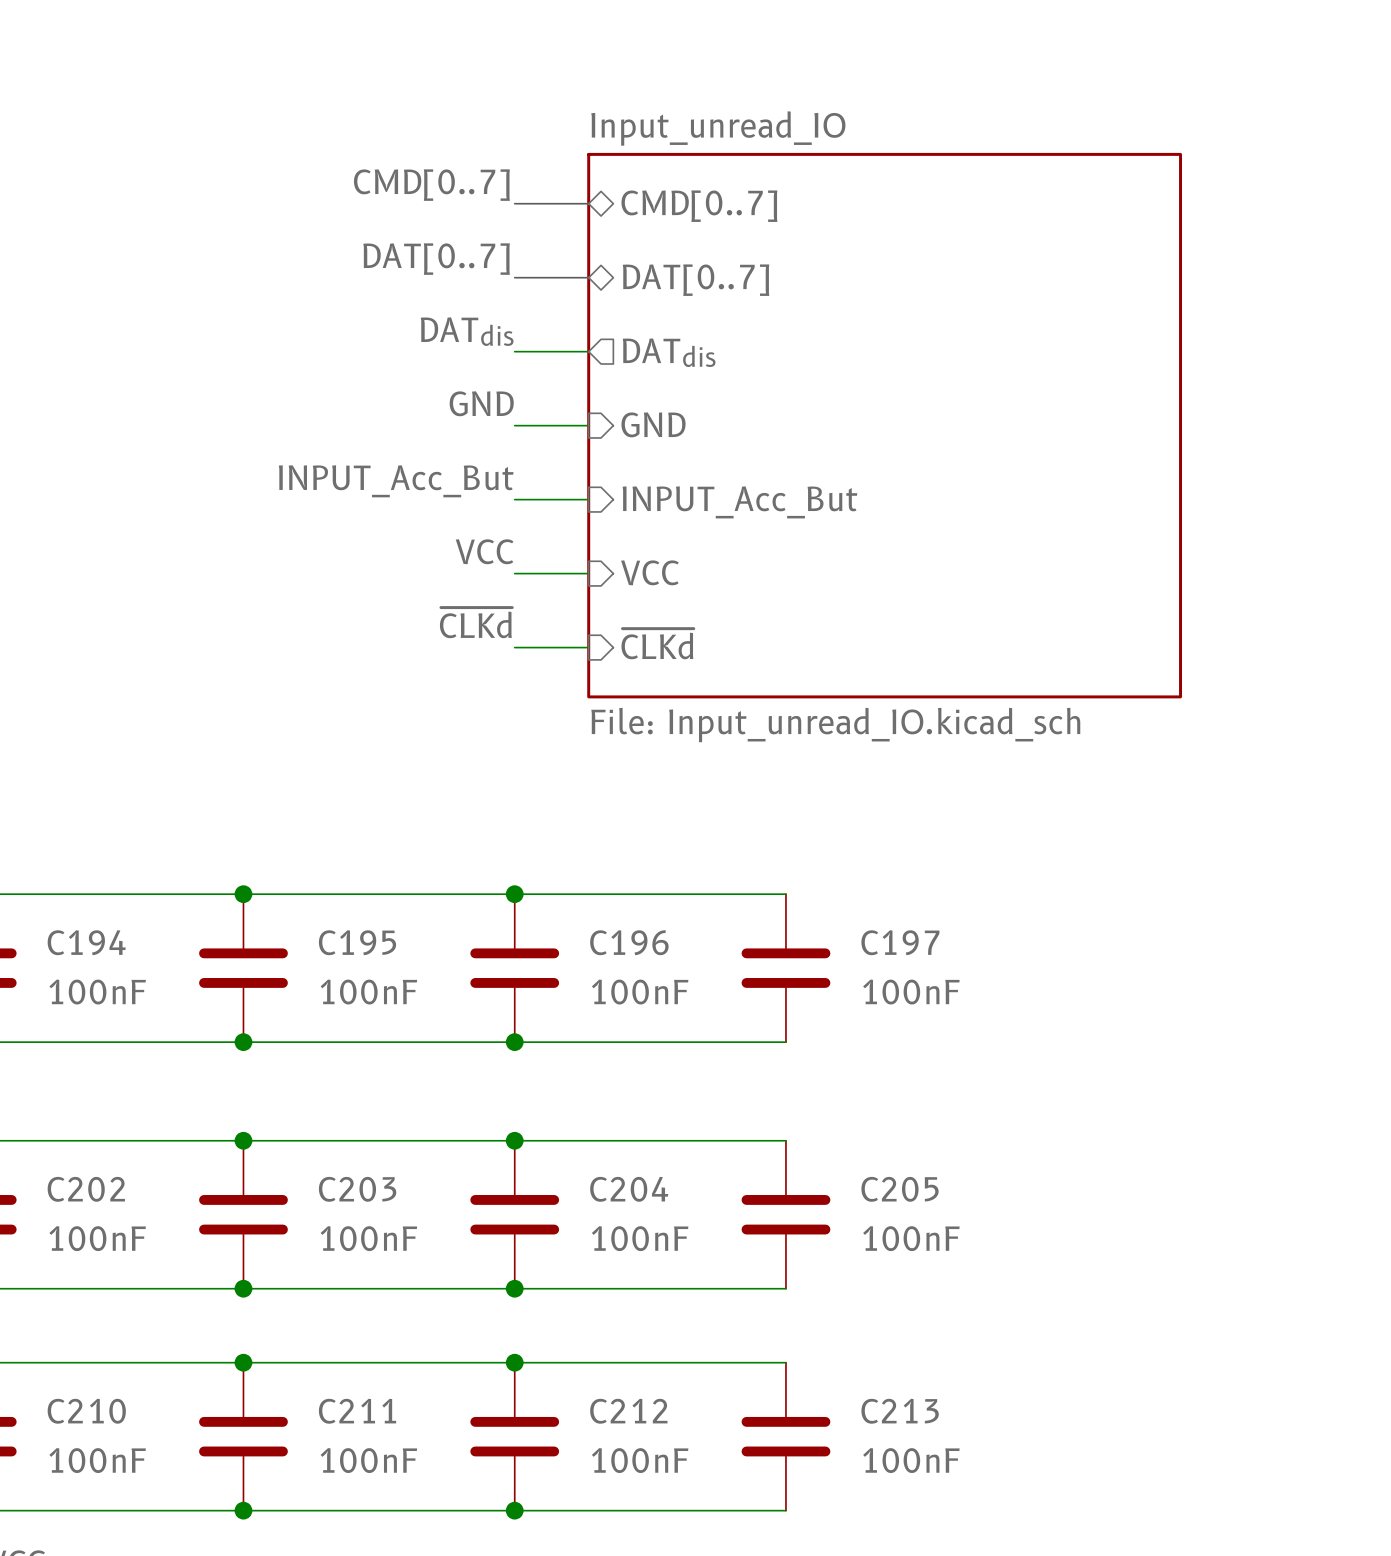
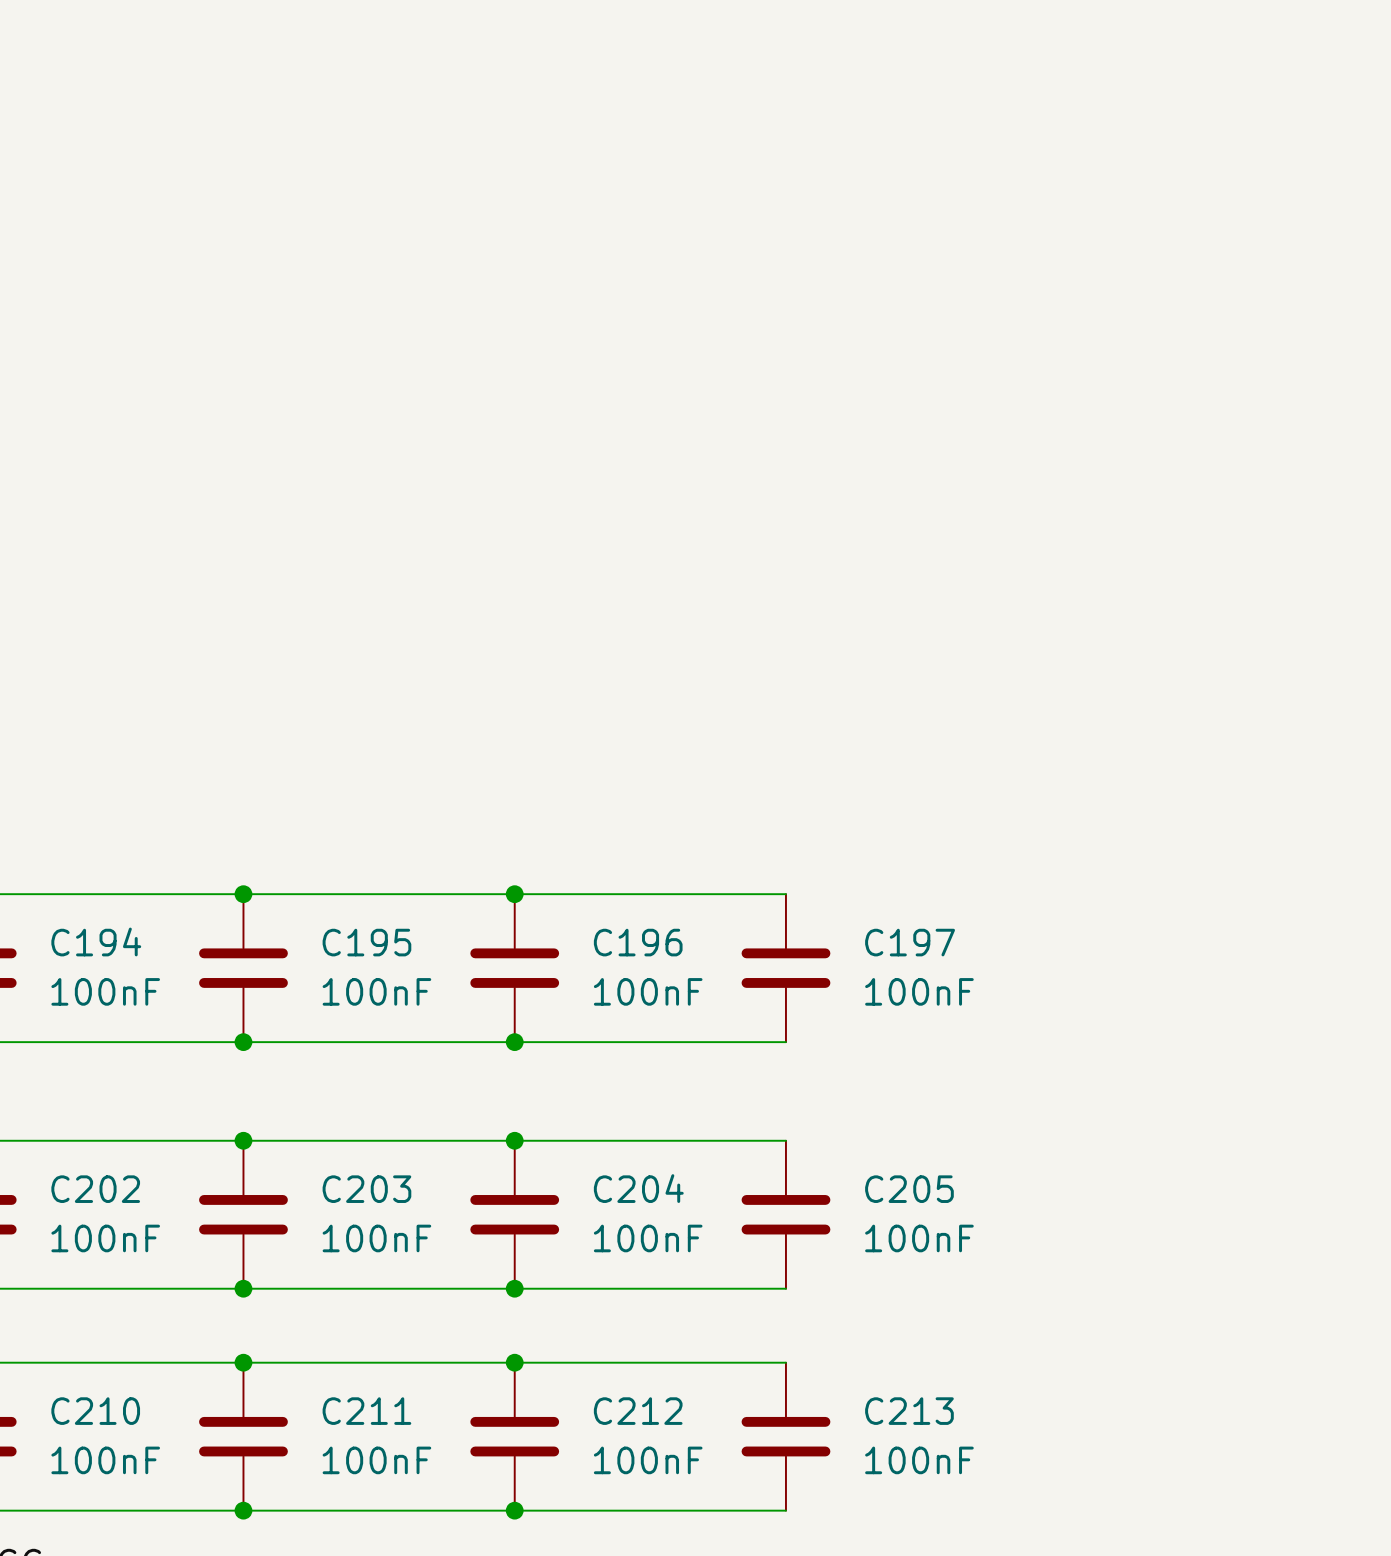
label: CMD[0..7] (431, 185) -> none
bus: (514, 203) (588, 203) -> none
sheet pin: CMD[0..7] (699, 206) -> none
label: DAT[0..7] (436, 259) -> none
bus: (514, 277) (588, 277) -> none
sheet pin: DAT[0..7] (696, 280) -> none
label: DATdis (467, 331) -> none
wire: (514, 351) (588, 351) -> none
sheet pin: DATdis (669, 352) -> none
label: GND (481, 403) -> none
sheet pin: GND (653, 424) -> none
wire: (514, 425) (588, 425) -> none
sheet Input_unread_IO: File: Input_unread_IO.kicad_sch (884, 425) -> none
label: INPUT_Acc_But (396, 481) -> none
wire: (514, 499) (588, 499) -> none
sheet pin: INPUT_Acc_But (739, 502) -> none
label: VCC (484, 551) -> none
sheet pin: VCC (649, 572) -> none
wire: (514, 573) (588, 573) -> none
label: ~{CLKd} (476, 622) -> none
sheet pin: ~{CLKd} (657, 643) -> none
wire: (514, 647) (588, 647) -> none

